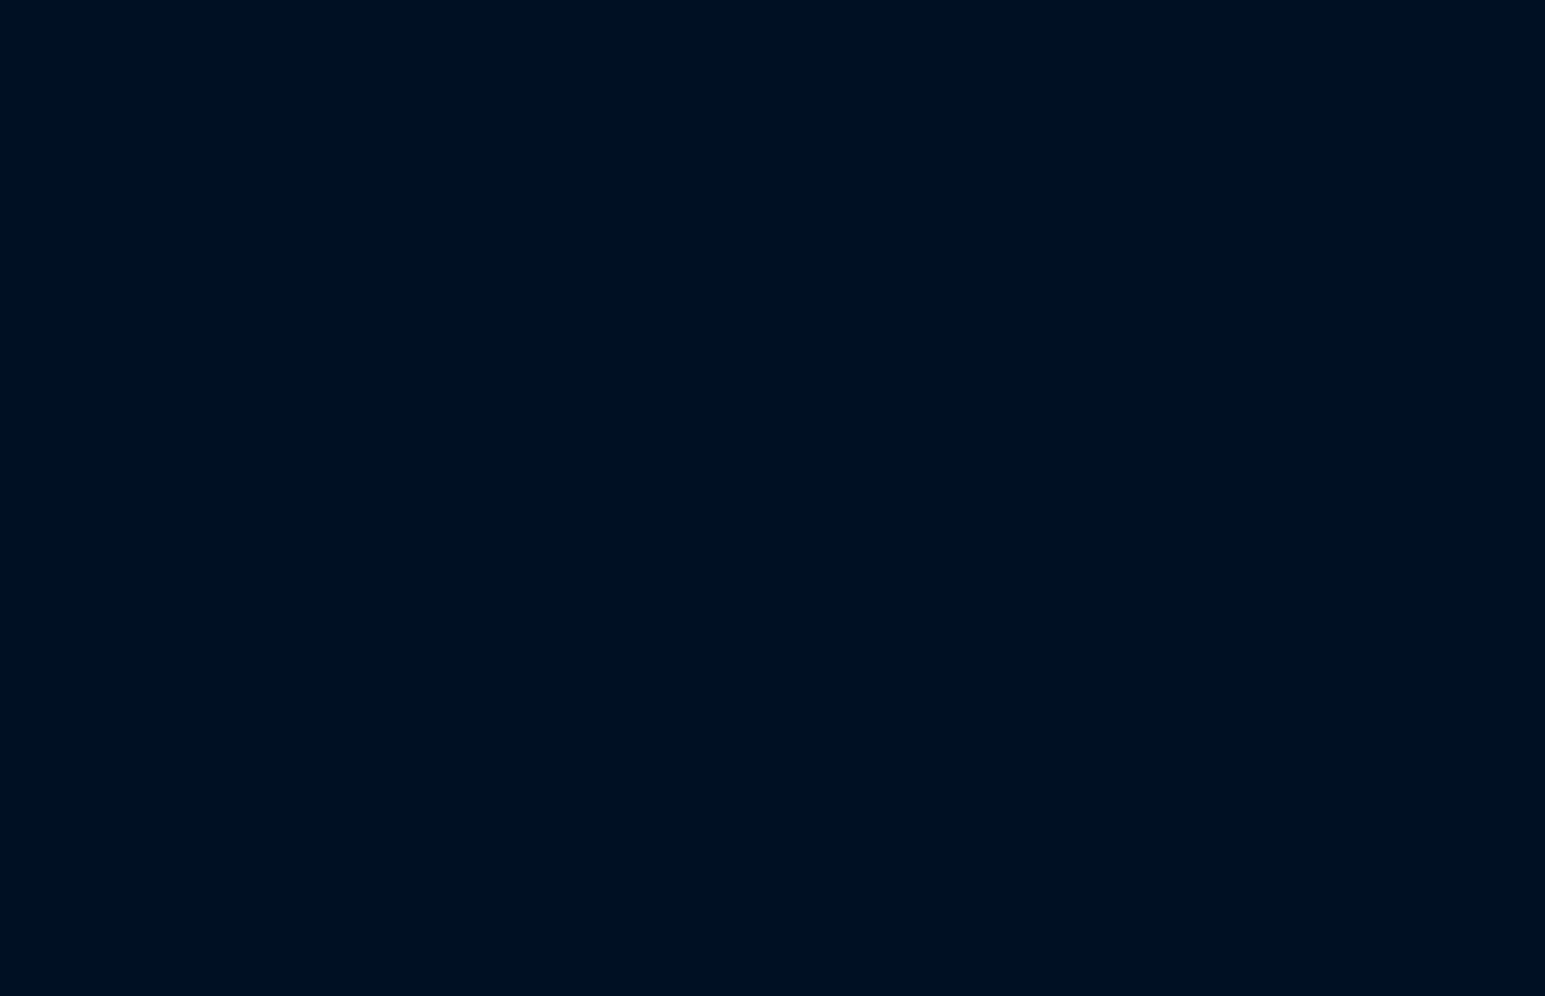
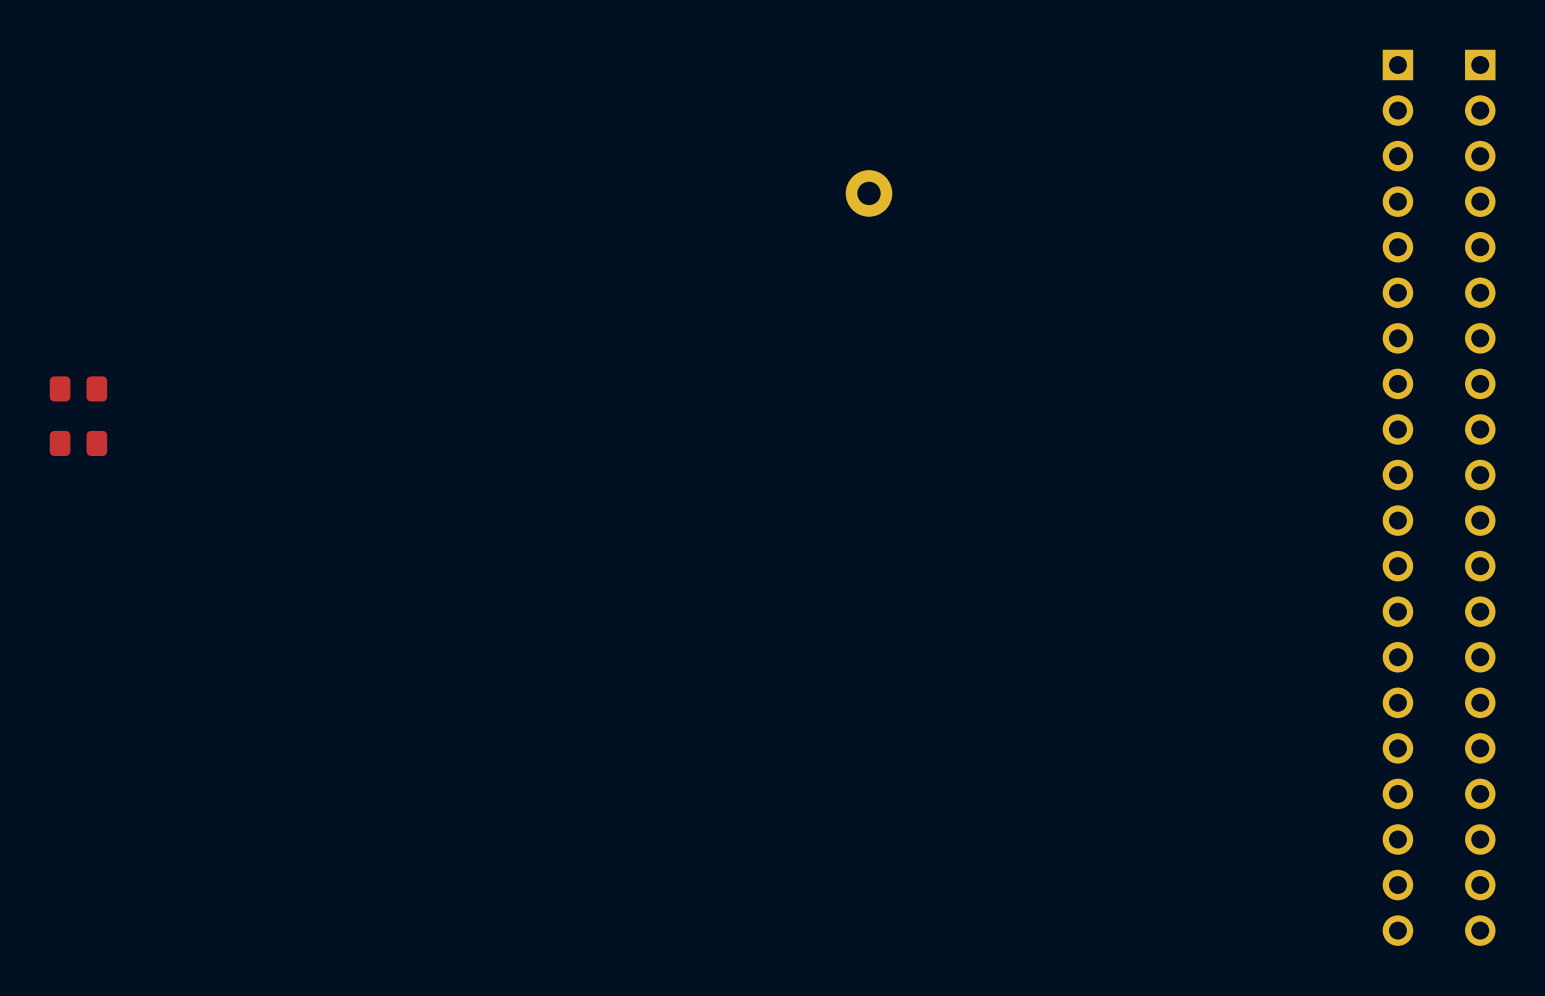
part: none -> (869, 193)
part: none -> (78, 388)
part: none -> (78, 443)
part: none -> (1397, 497)
part: none -> (1480, 497)

